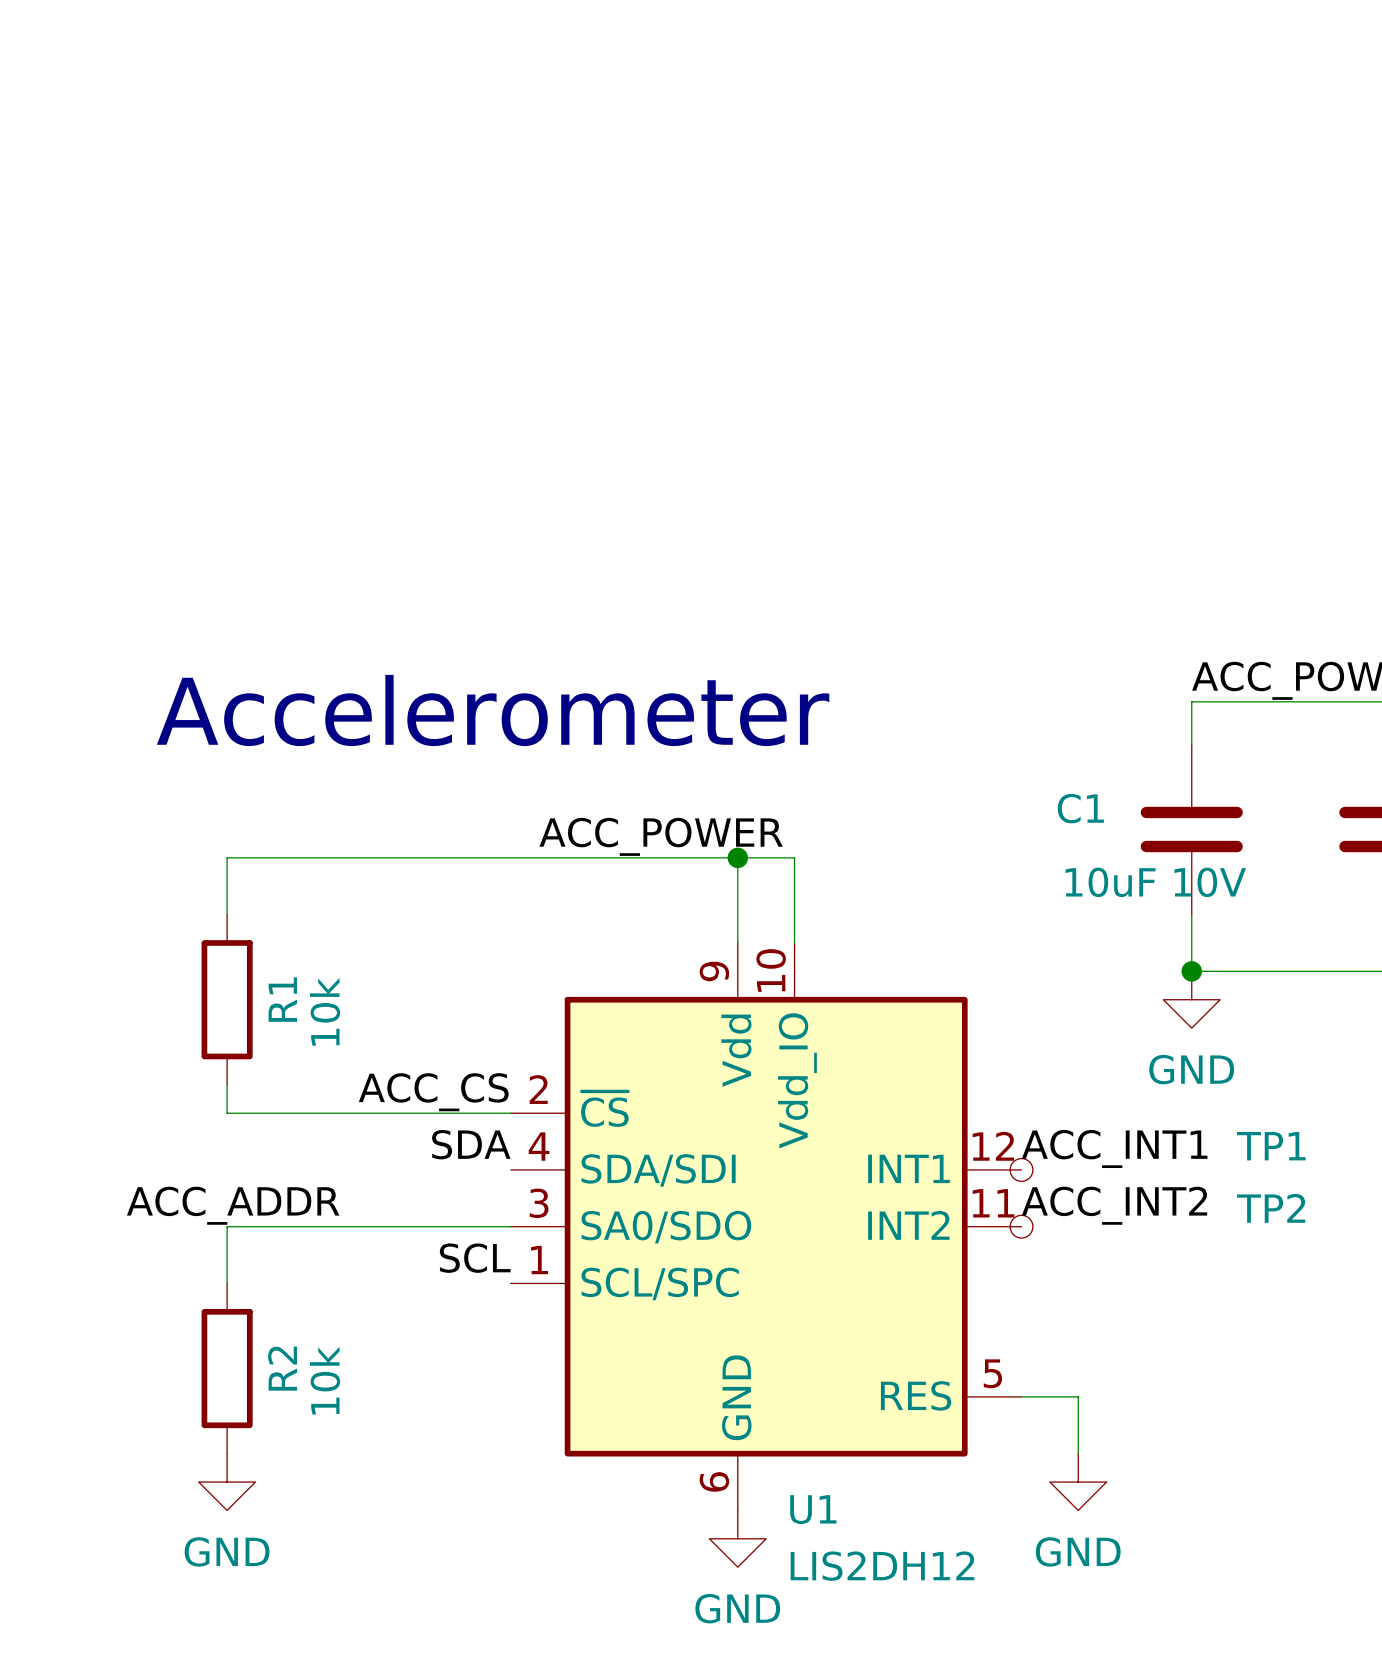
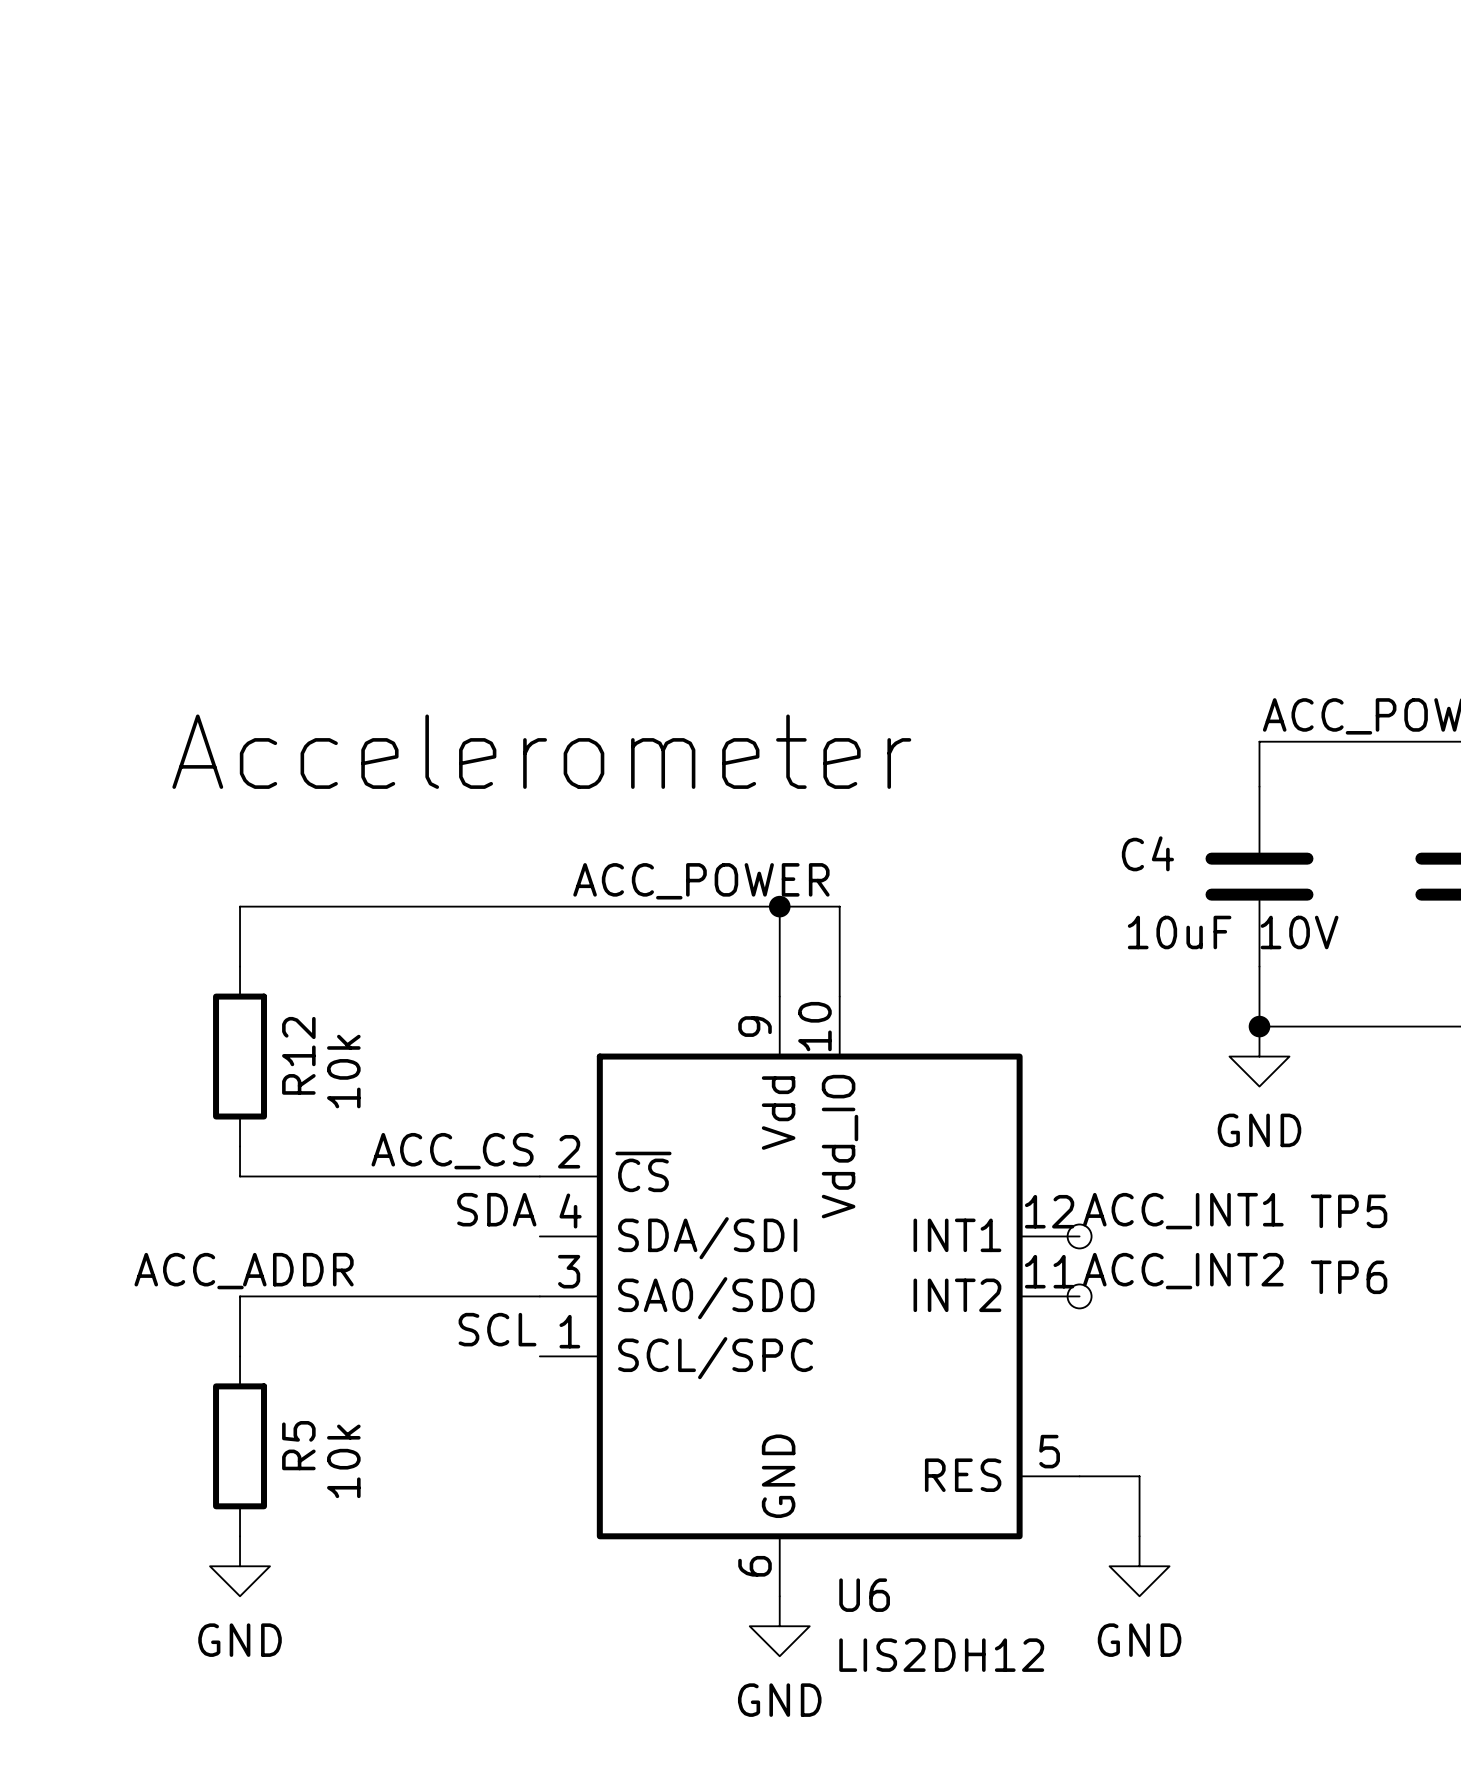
C1 name: C1 (1080, 808) -> C4 (1147, 853)
R1 name: R1 (282, 999) -> R12 (298, 1055)
TP1 name: TP1 (1271, 1146) -> TP5 (1349, 1211)
TP2 name: TP2 (1271, 1208) -> TP6 (1349, 1277)
R2 name: R2 (282, 1368) -> R5 (298, 1445)
U1 name: U1 (813, 1509) -> U6 (864, 1595)

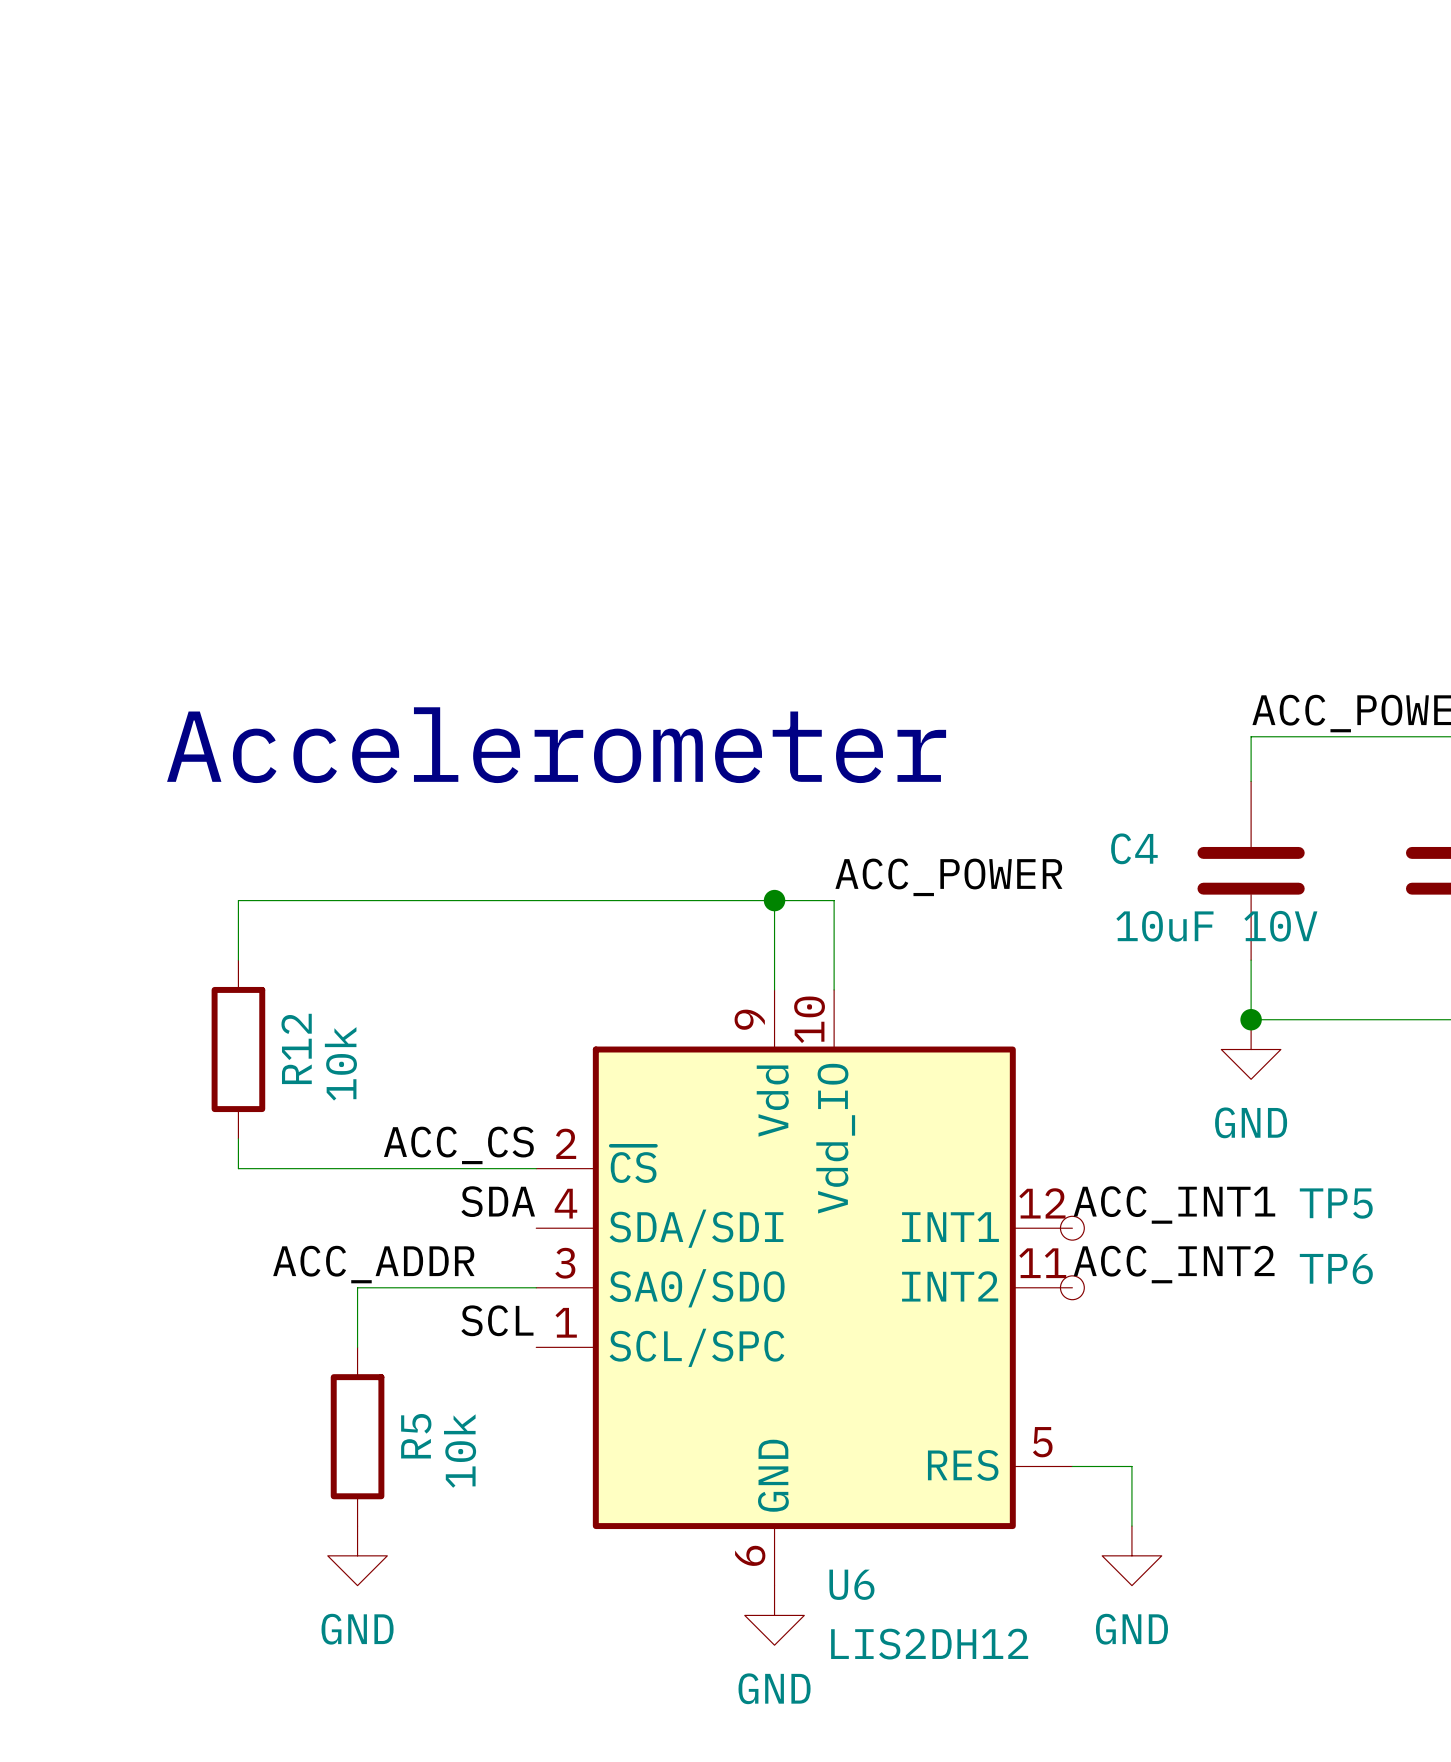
label position: ACC_POWER (701, 881) -> ACC_POWER (948, 877)
label position: ACC_ADDR (244, 1271) -> ACC_ADDR (373, 1264)
wire: (359, 1296) (240, 1296) (240, 1356) -> (357, 1287) (357, 1347)
R5 position: (240, 1446) -> (357, 1436)
power symbol position: GND (240, 1566) -> GND (357, 1555)

